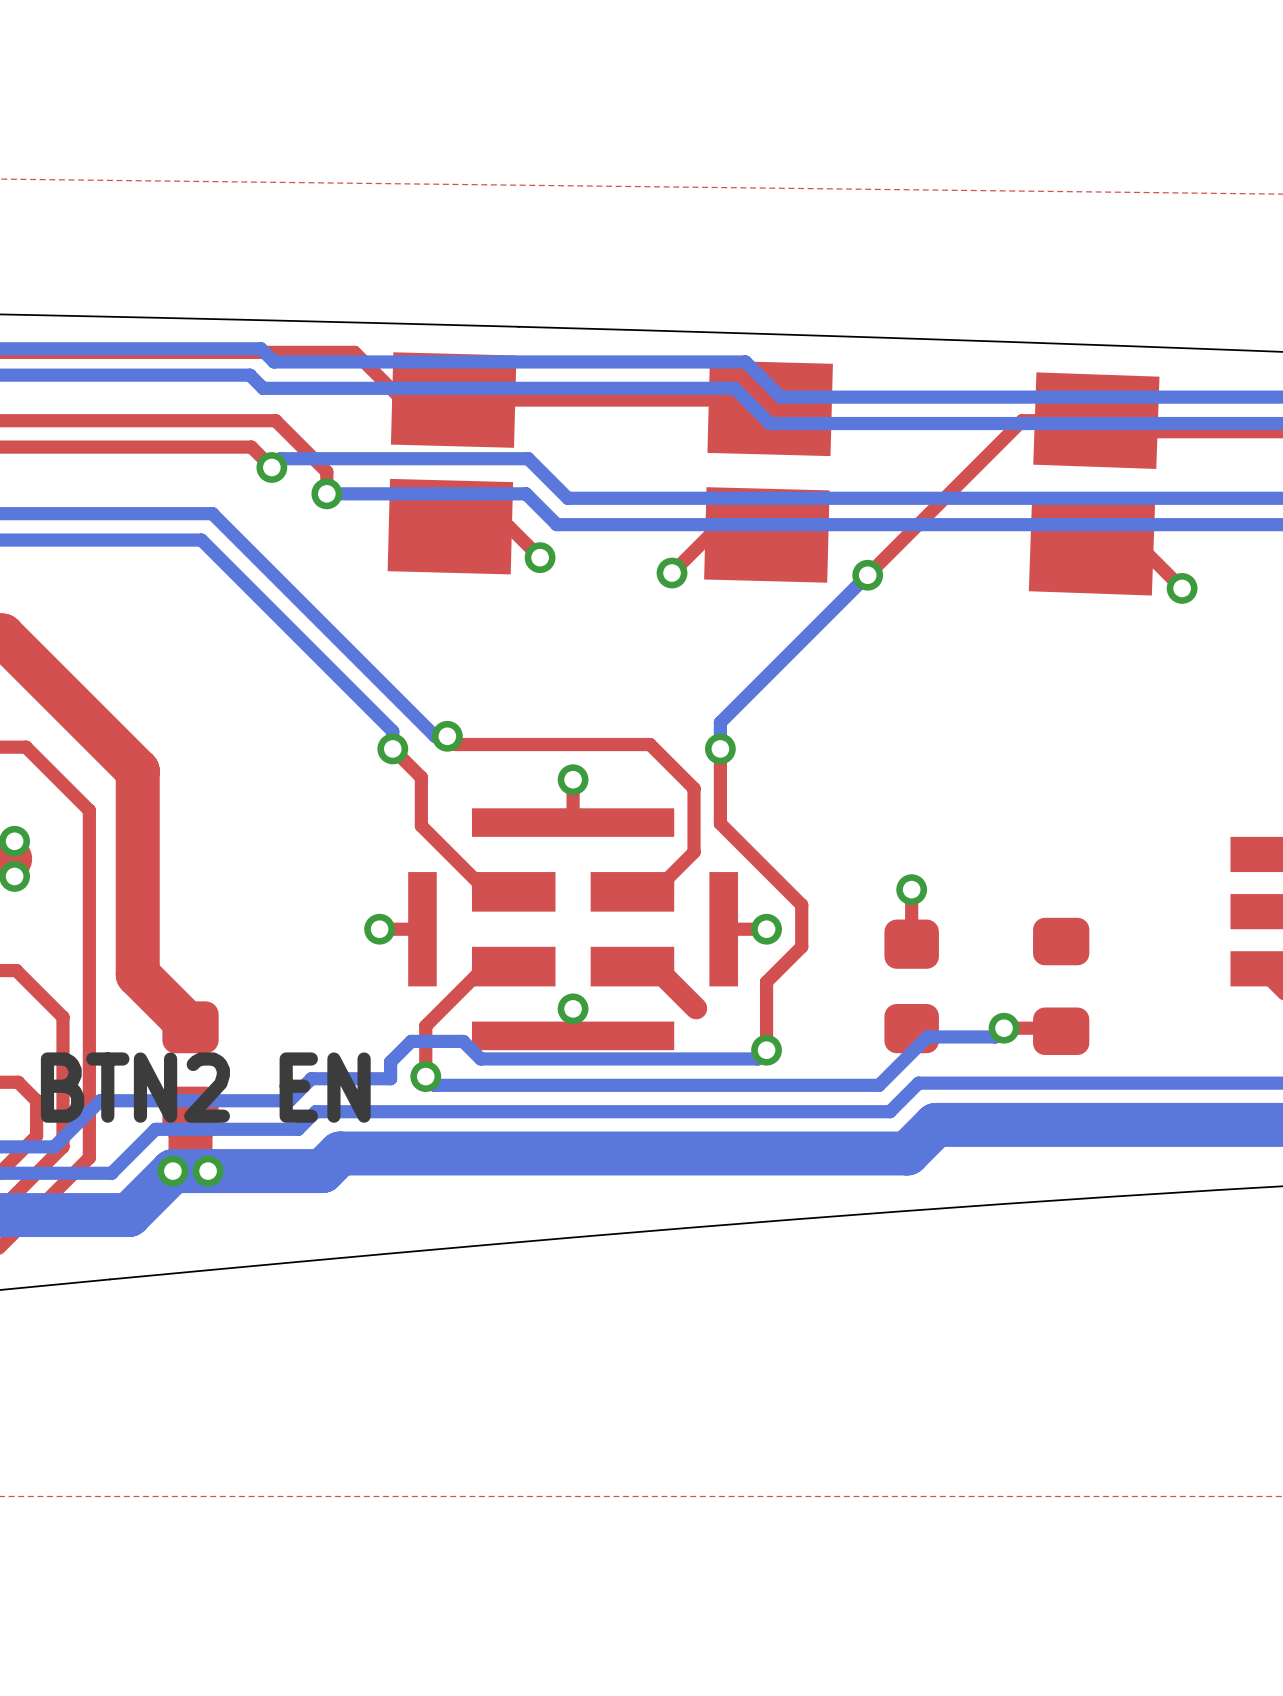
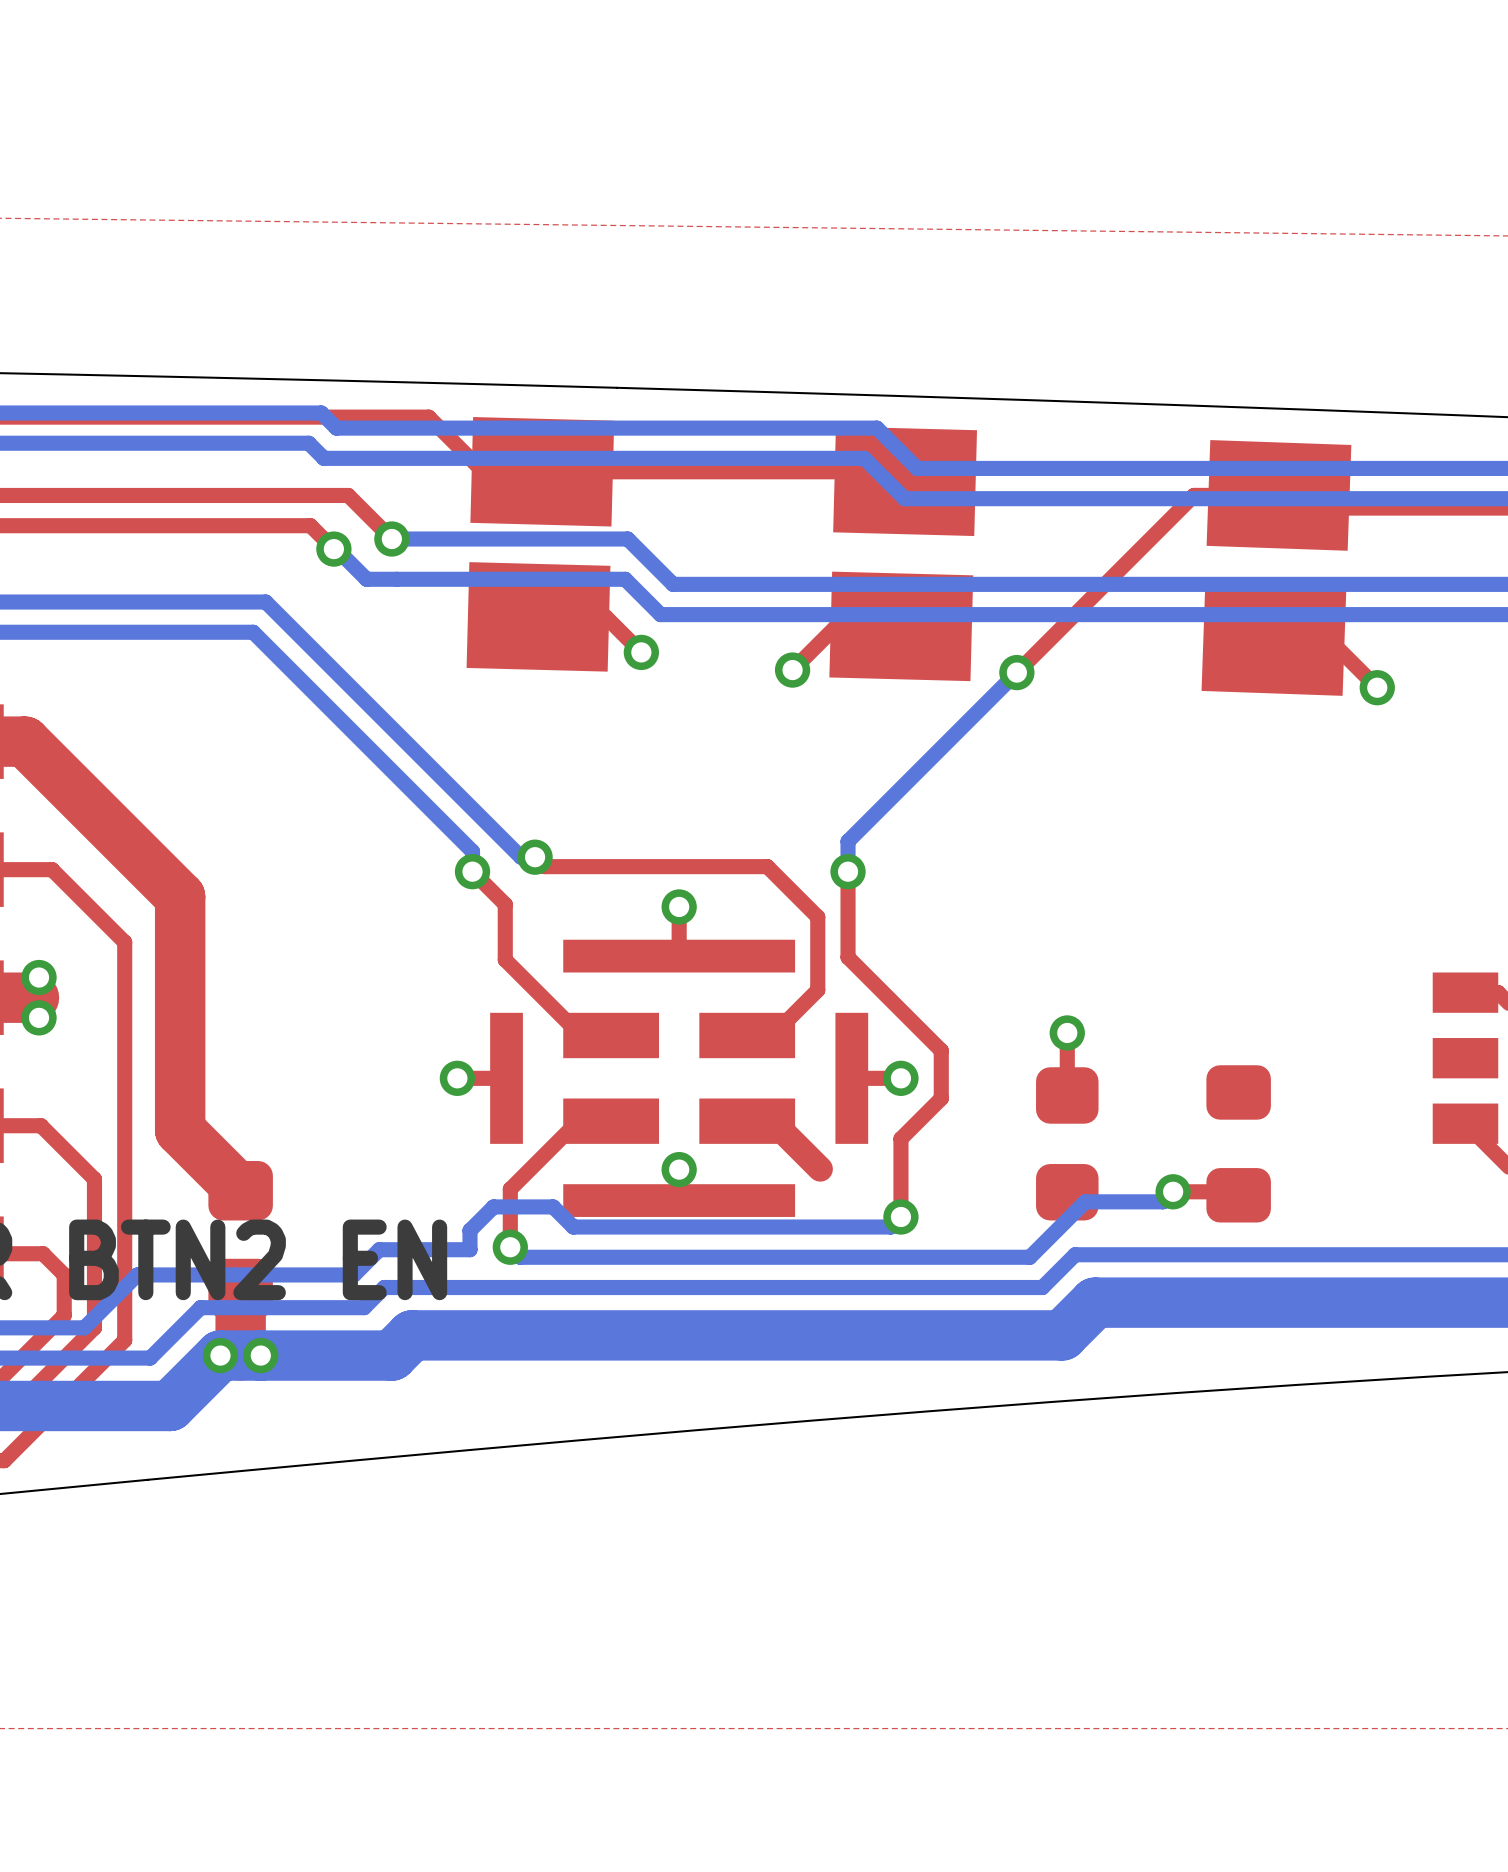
top track: (275, 420) (326, 471) (326, 493) -> (338, 495) (348, 495) (391, 539)
bottom track: (322, 458) (280, 458) (271, 467) -> none
bottom track: none -> (331, 544) (366, 579) (396, 579)
via position: (326, 493) -> (391, 539)

